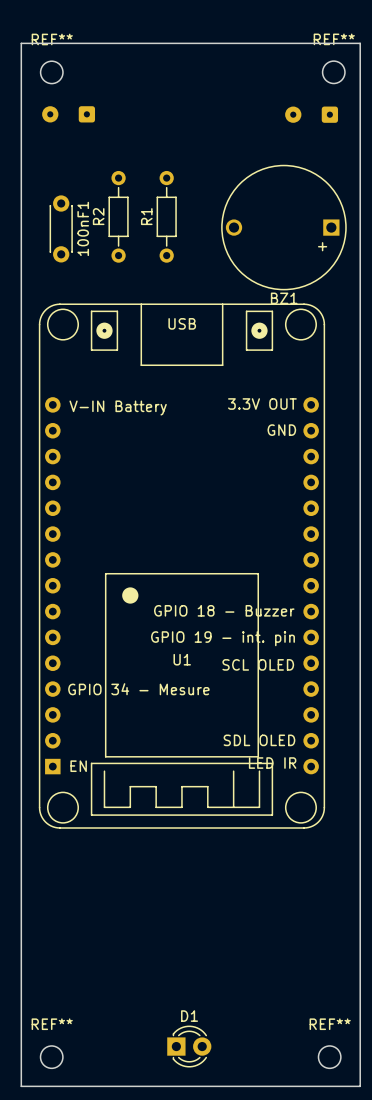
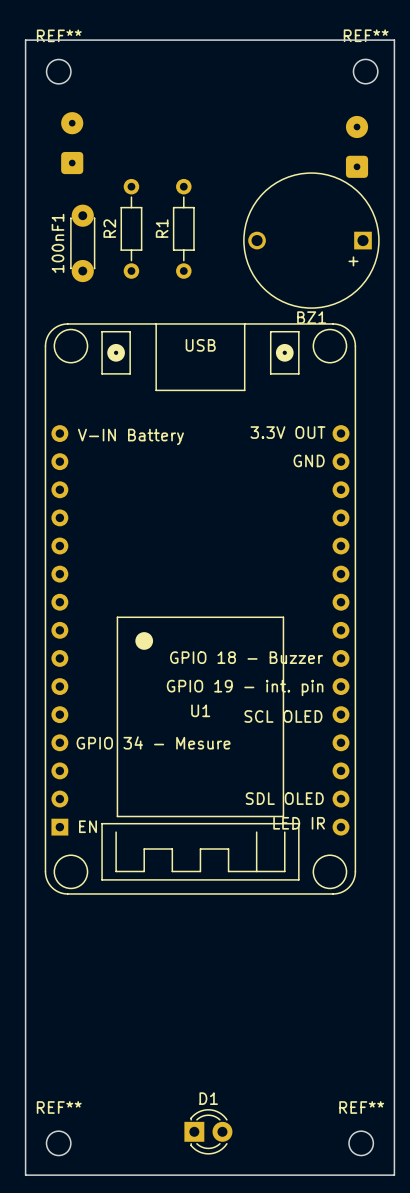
part: (68, 114) -> none
part: (311, 114) -> none
part: none -> (72, 143)
part: none -> (357, 146)
100nF1 footprint: [49, 195, 73, 263] -> [70, 204, 96, 283]
100nF1 name position: 100nF1 (83, 228) -> 100nF1 (58, 243)

